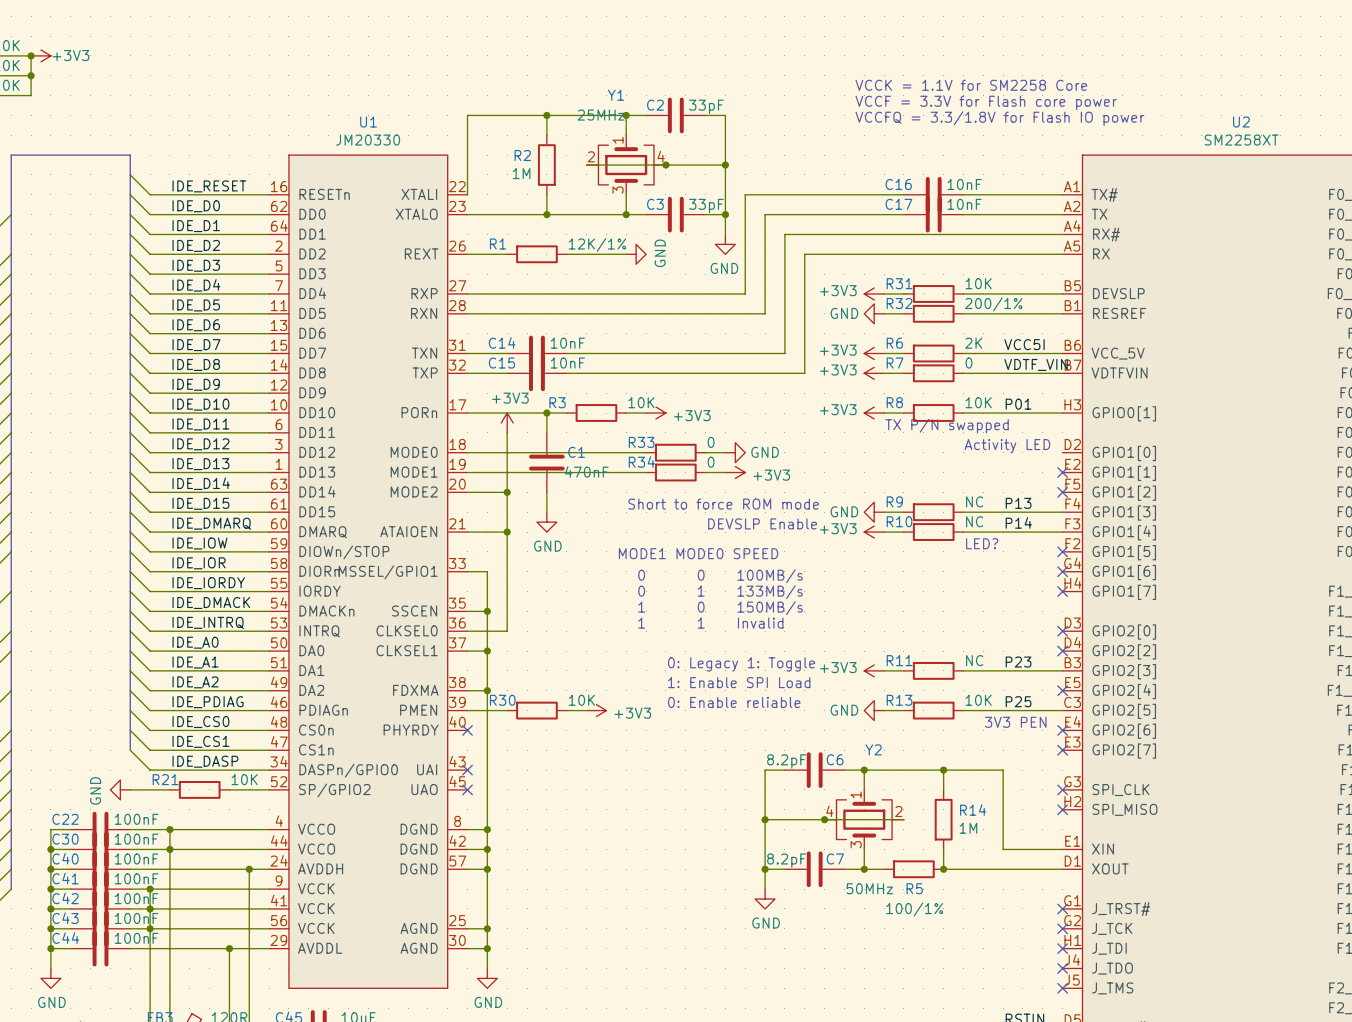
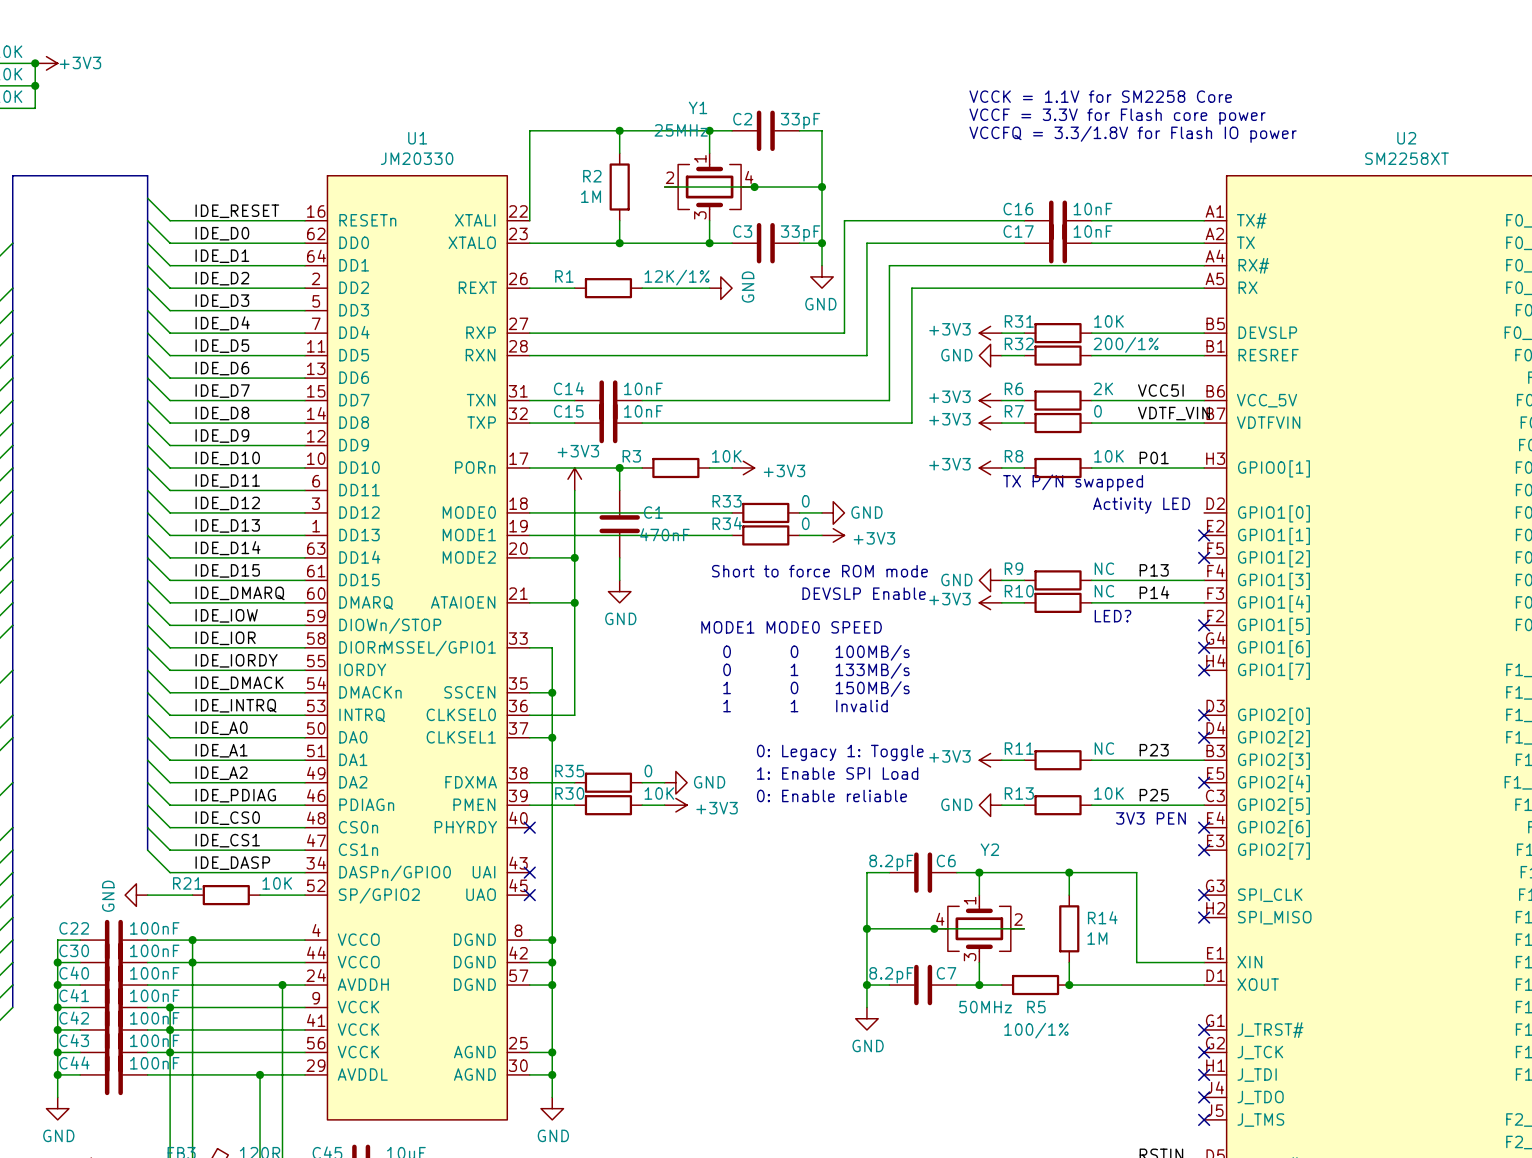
wire: none -> (552, 782) (574, 782)
junction: (487, 690) -> none
R35: none -> 0 (608, 782)
wire: none -> (642, 782) (664, 782)
power symbol: none -> GND (675, 782)

